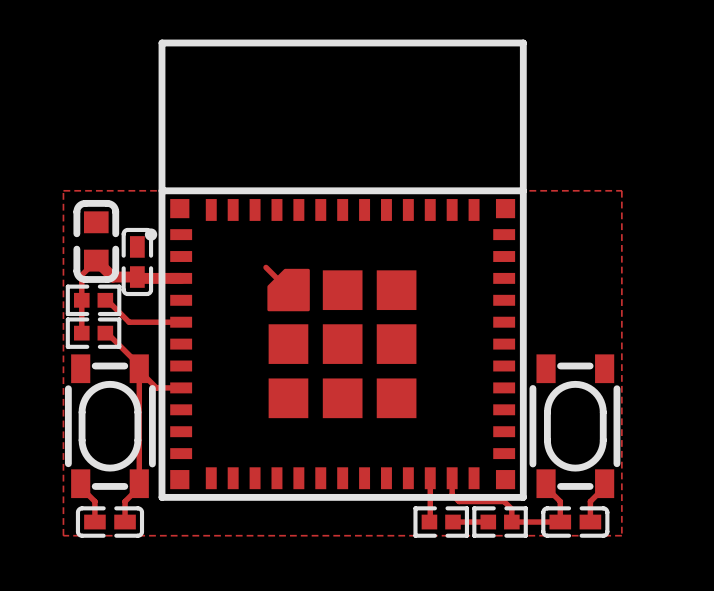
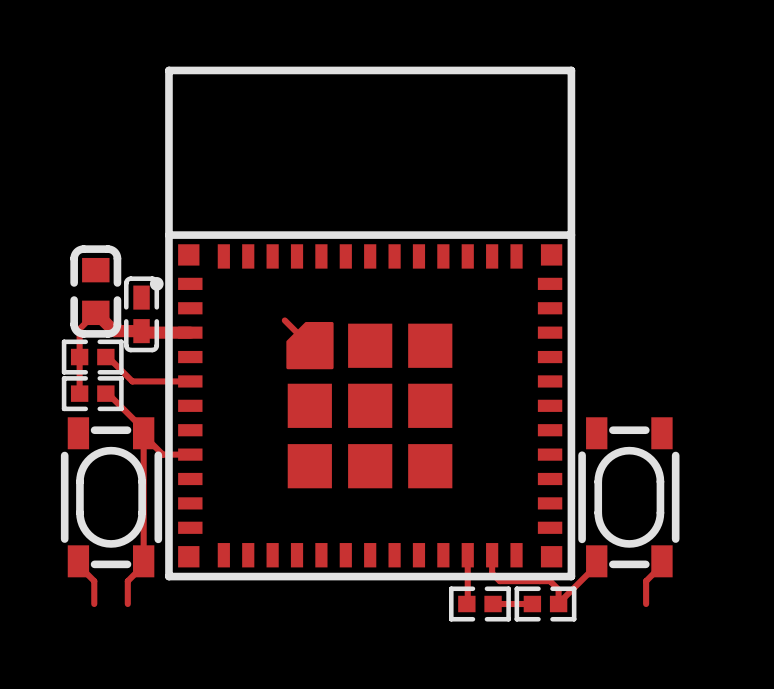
top zone outline: (63, 190) (621, 190) (621, 535) (63, 535) (63, 190) -> none
top track: (546, 487) (560, 501) (560, 522) (511, 522) -> (596, 565) (558, 604)
part: (109, 522) -> none
part: (575, 522) -> none

